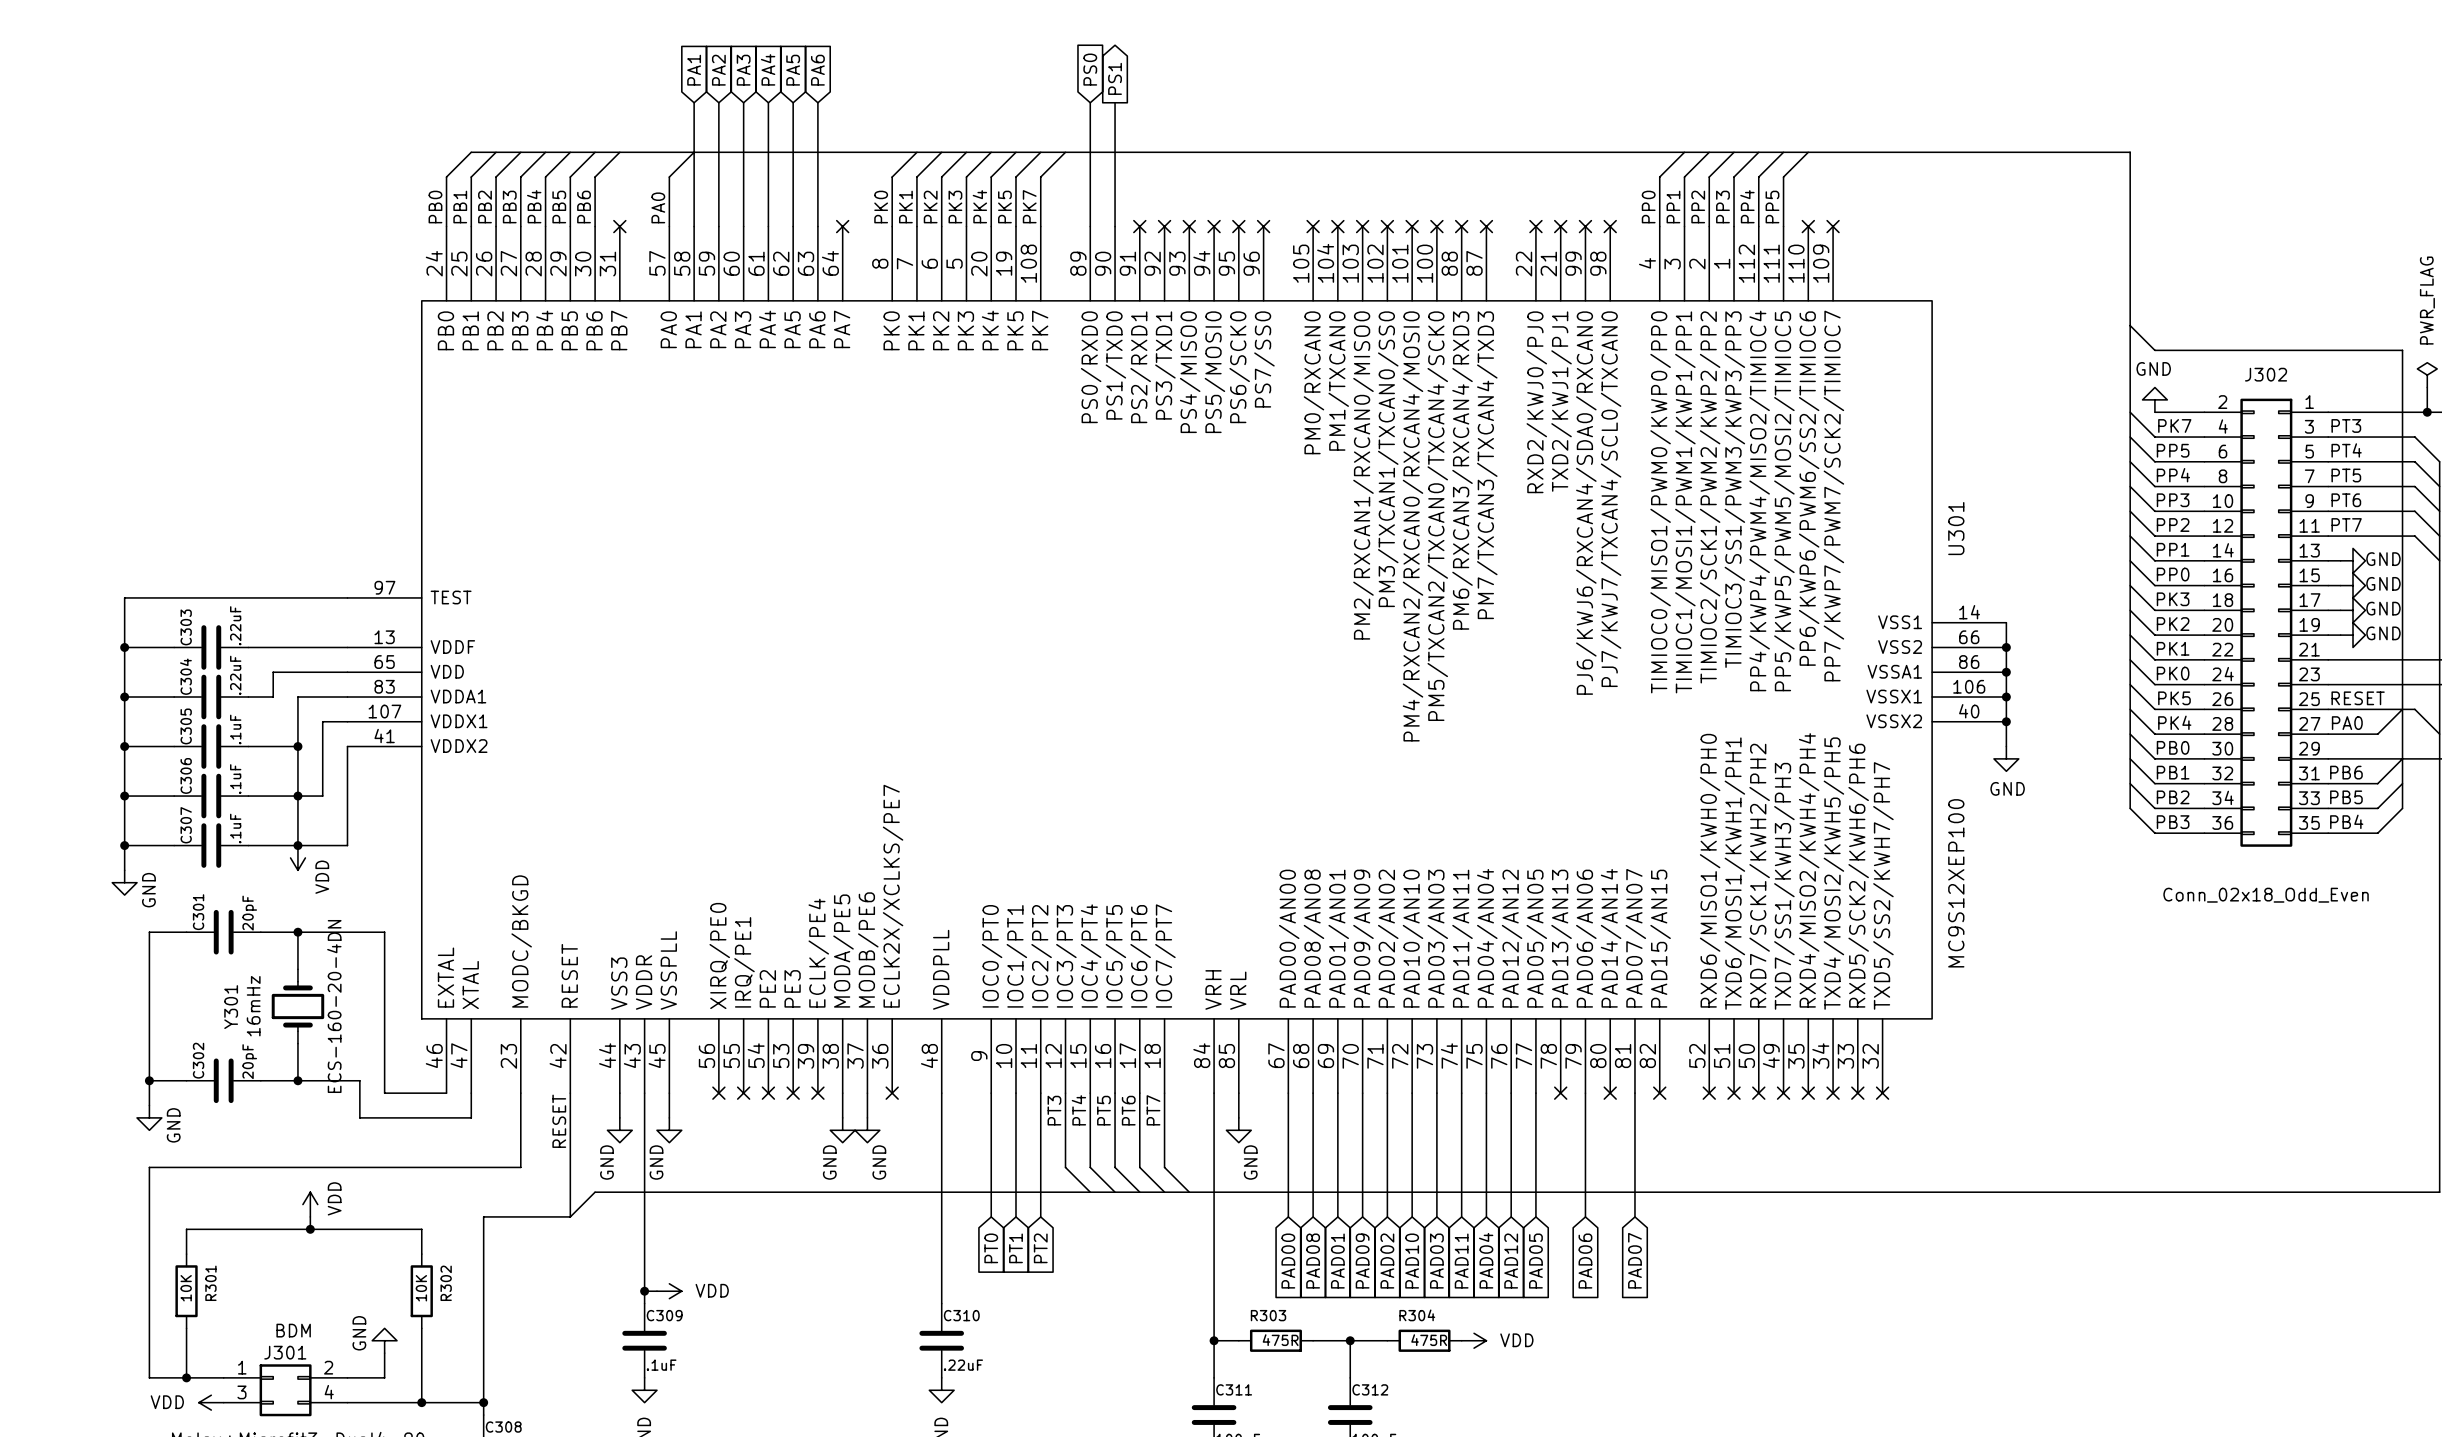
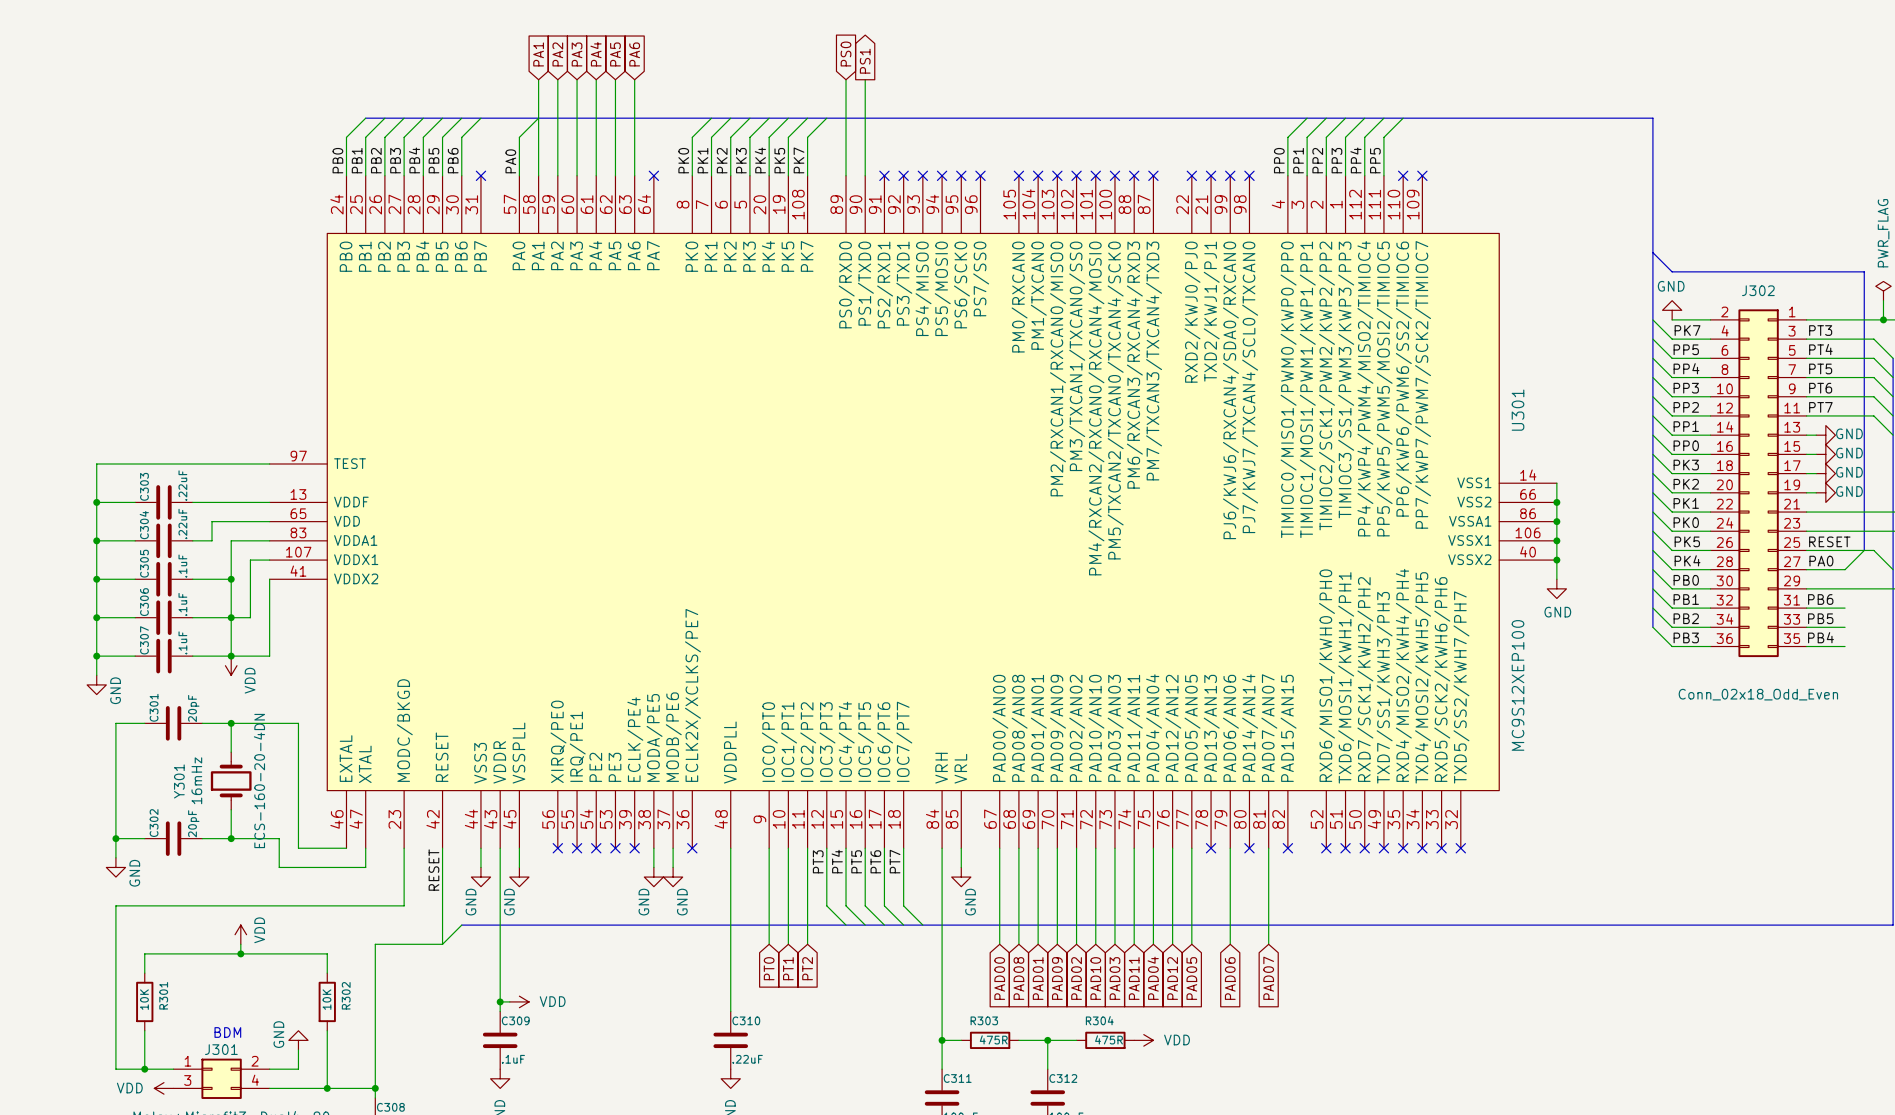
bus: (2402, 709) (2402, 808) -> none
wire: (2402, 758) (2377, 783) -> none
wire: (2402, 783) (2377, 808) -> none
wire: (2402, 808) (2377, 833) -> none

